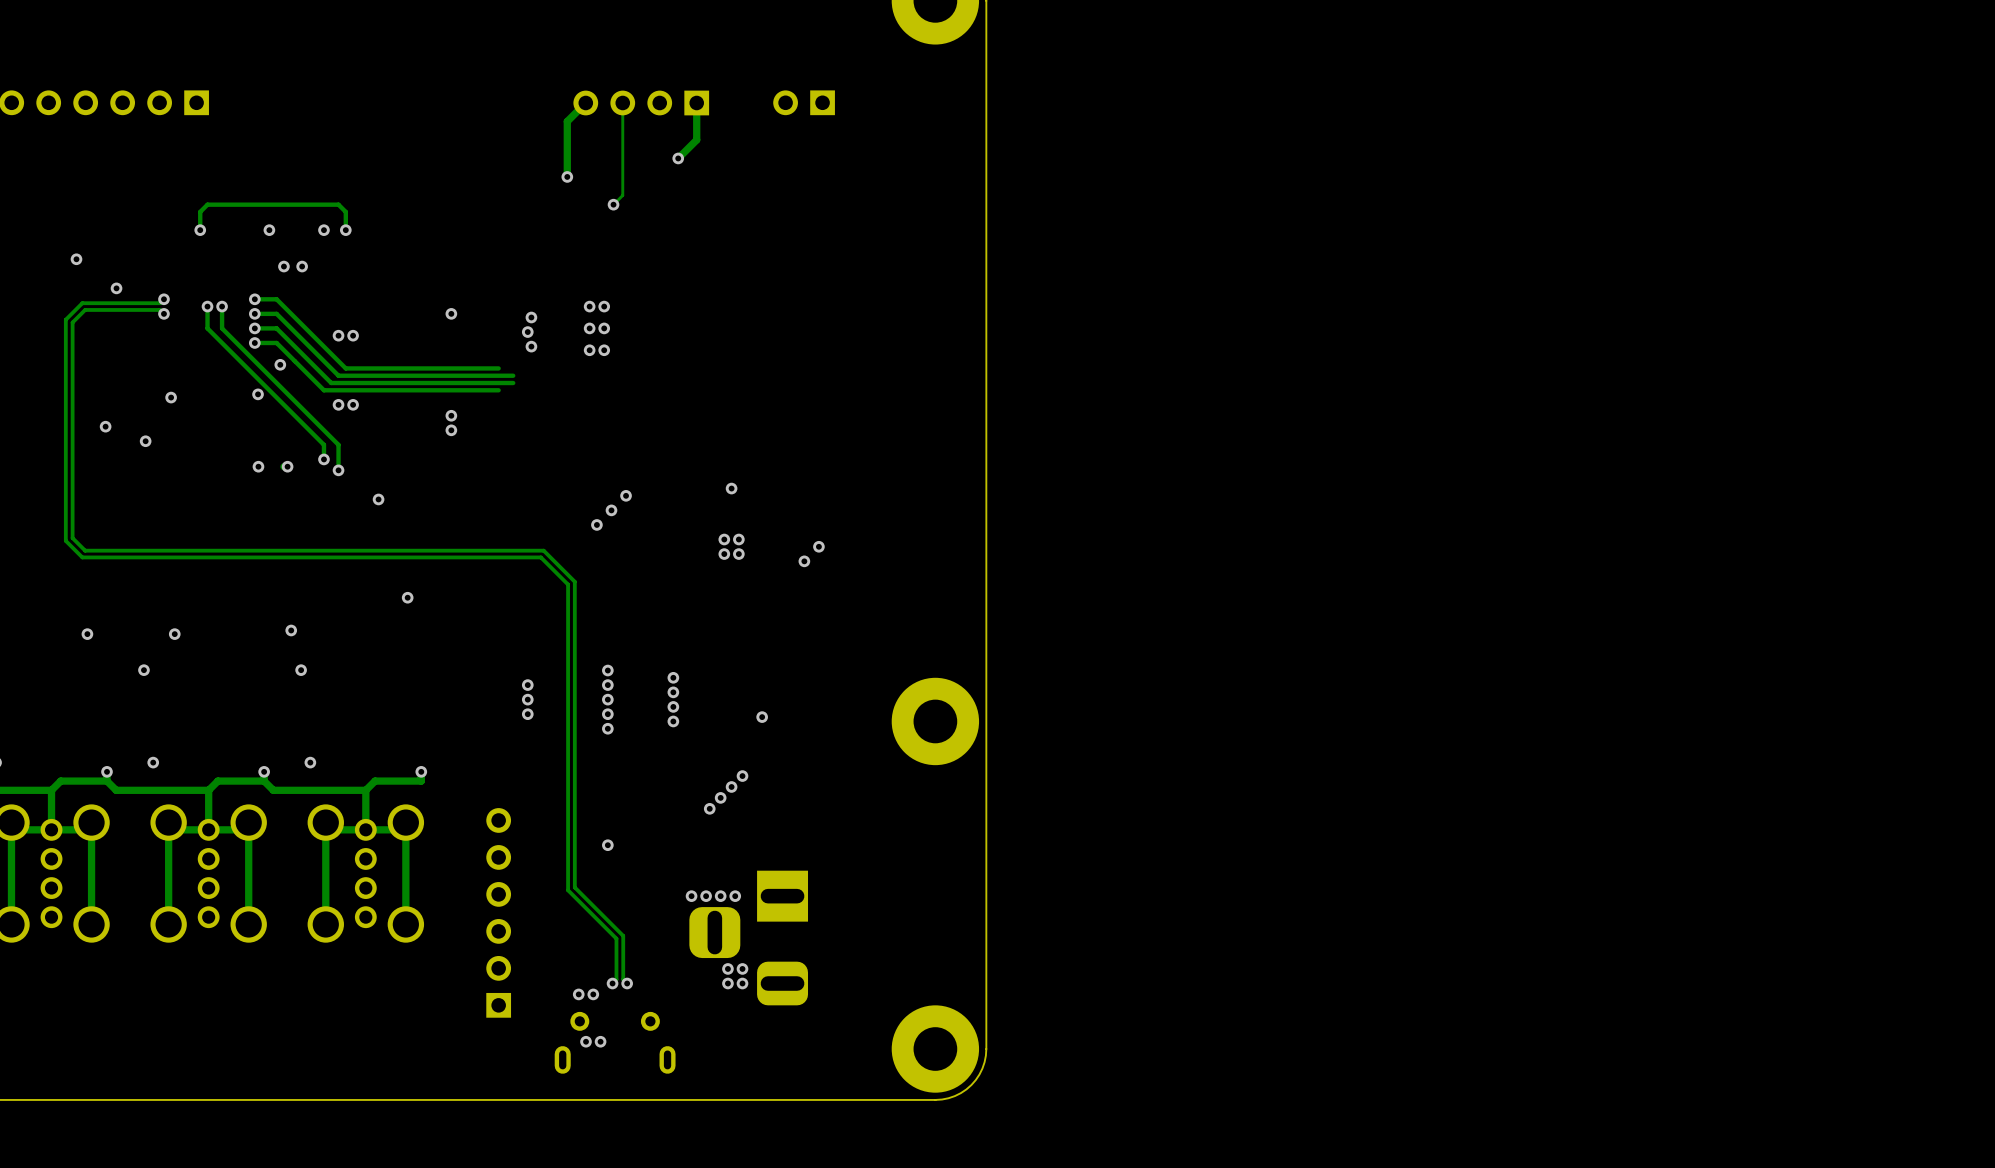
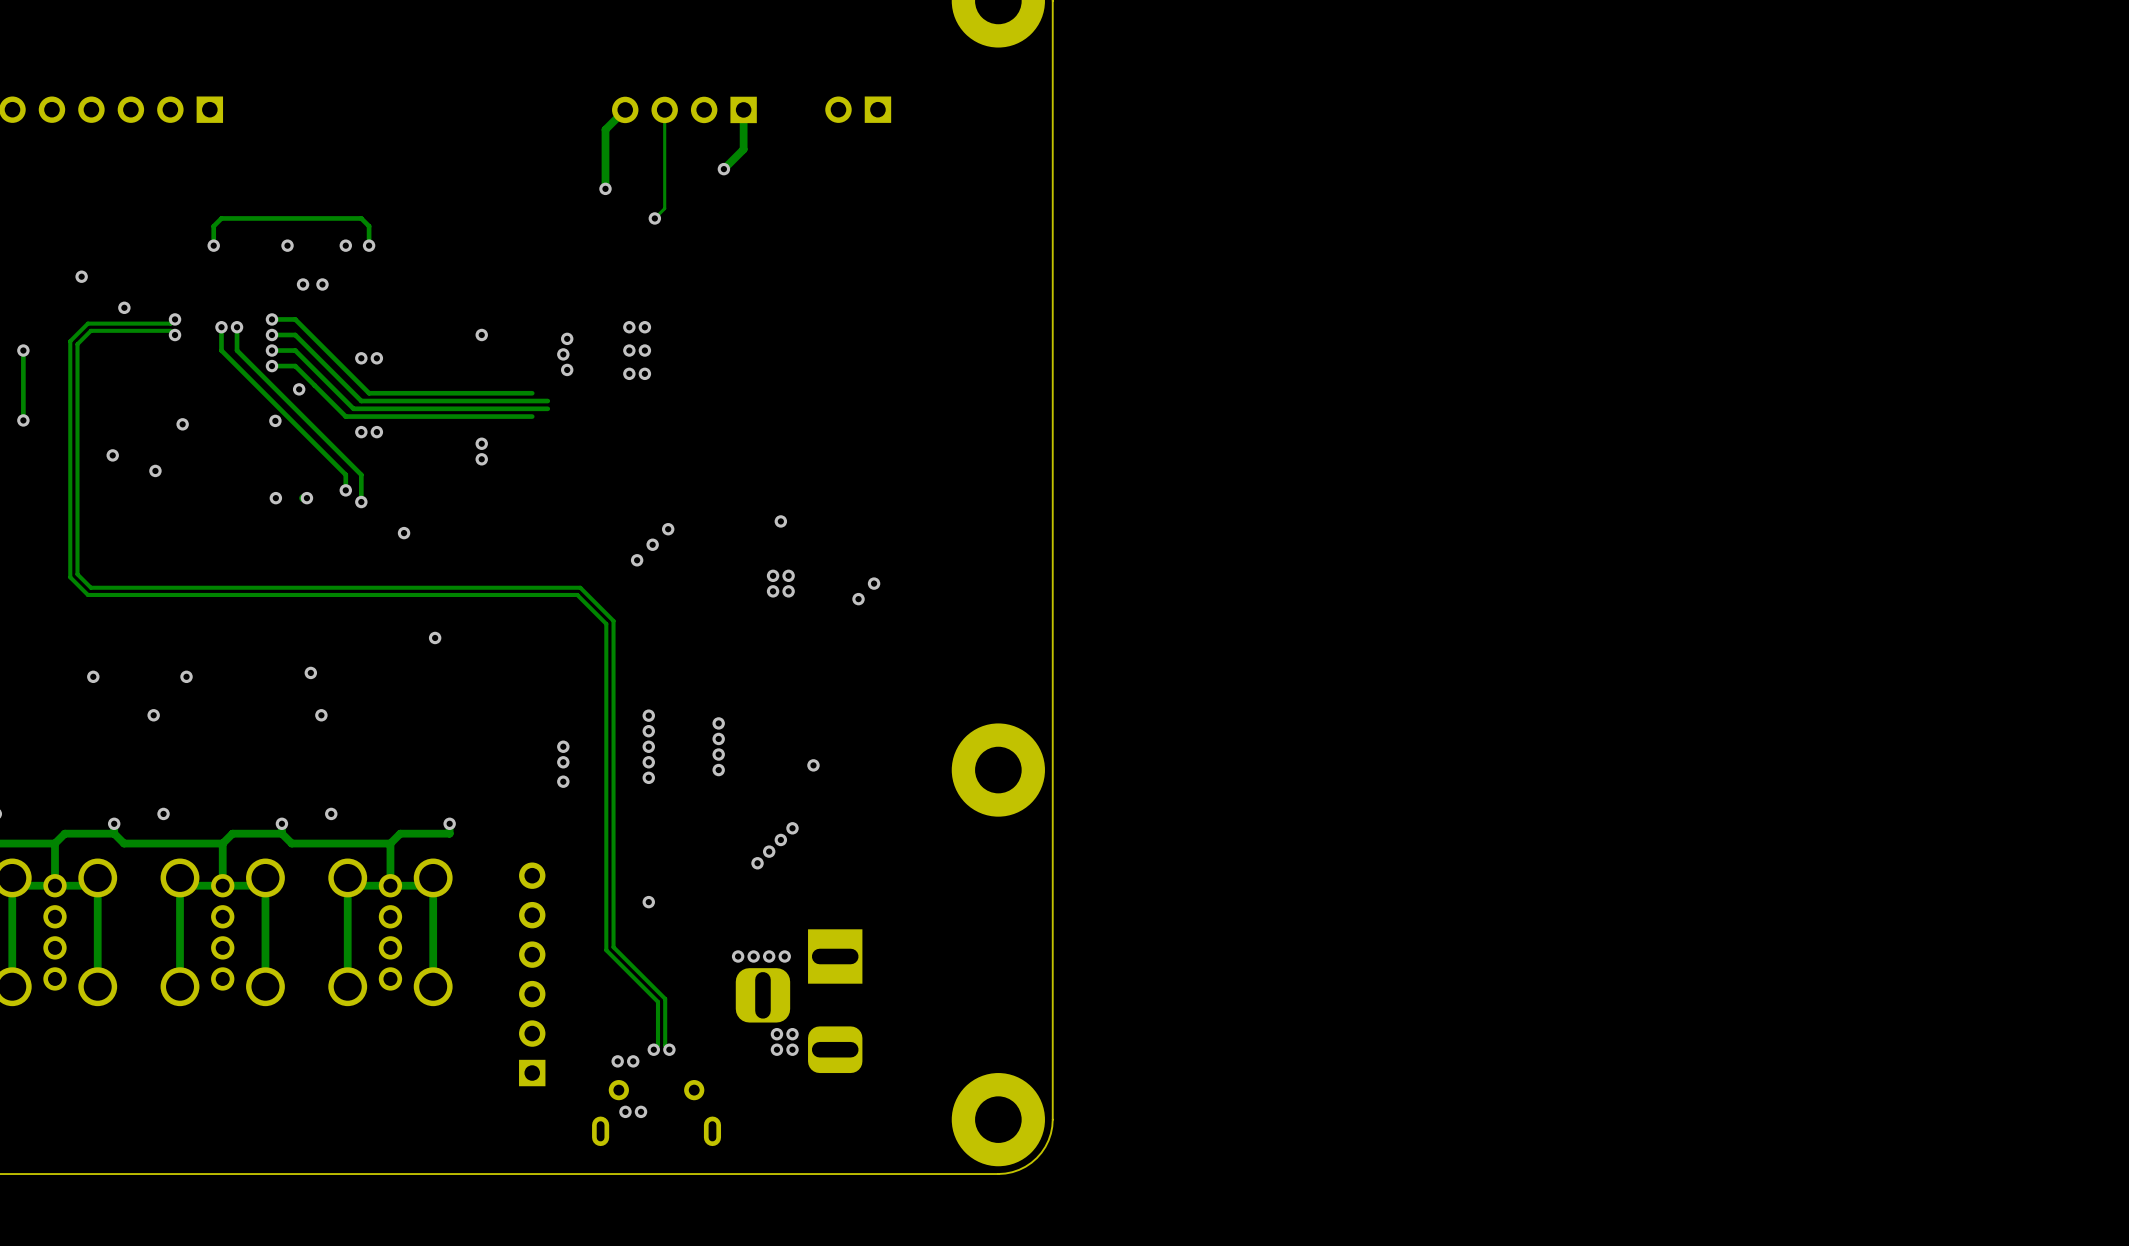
track: none -> (23, 350) (23, 420)
via: none -> (23, 350)
via: none -> (23, 420)
via position: (527, 685) -> (563, 781)

